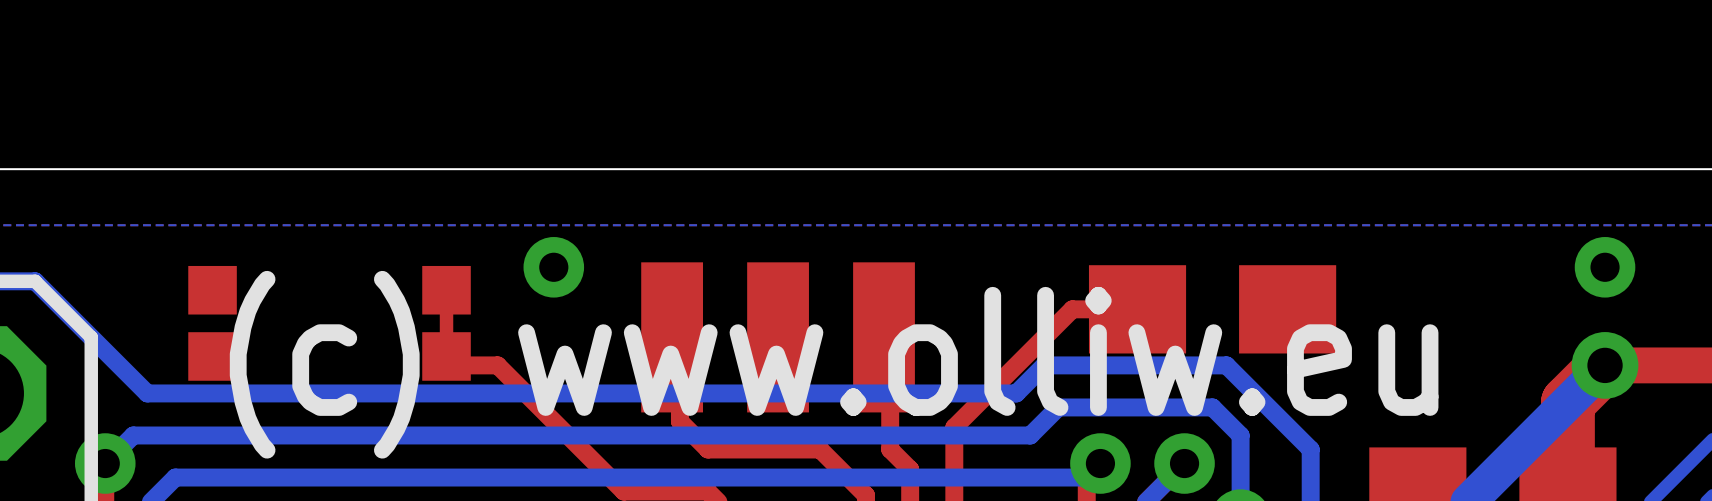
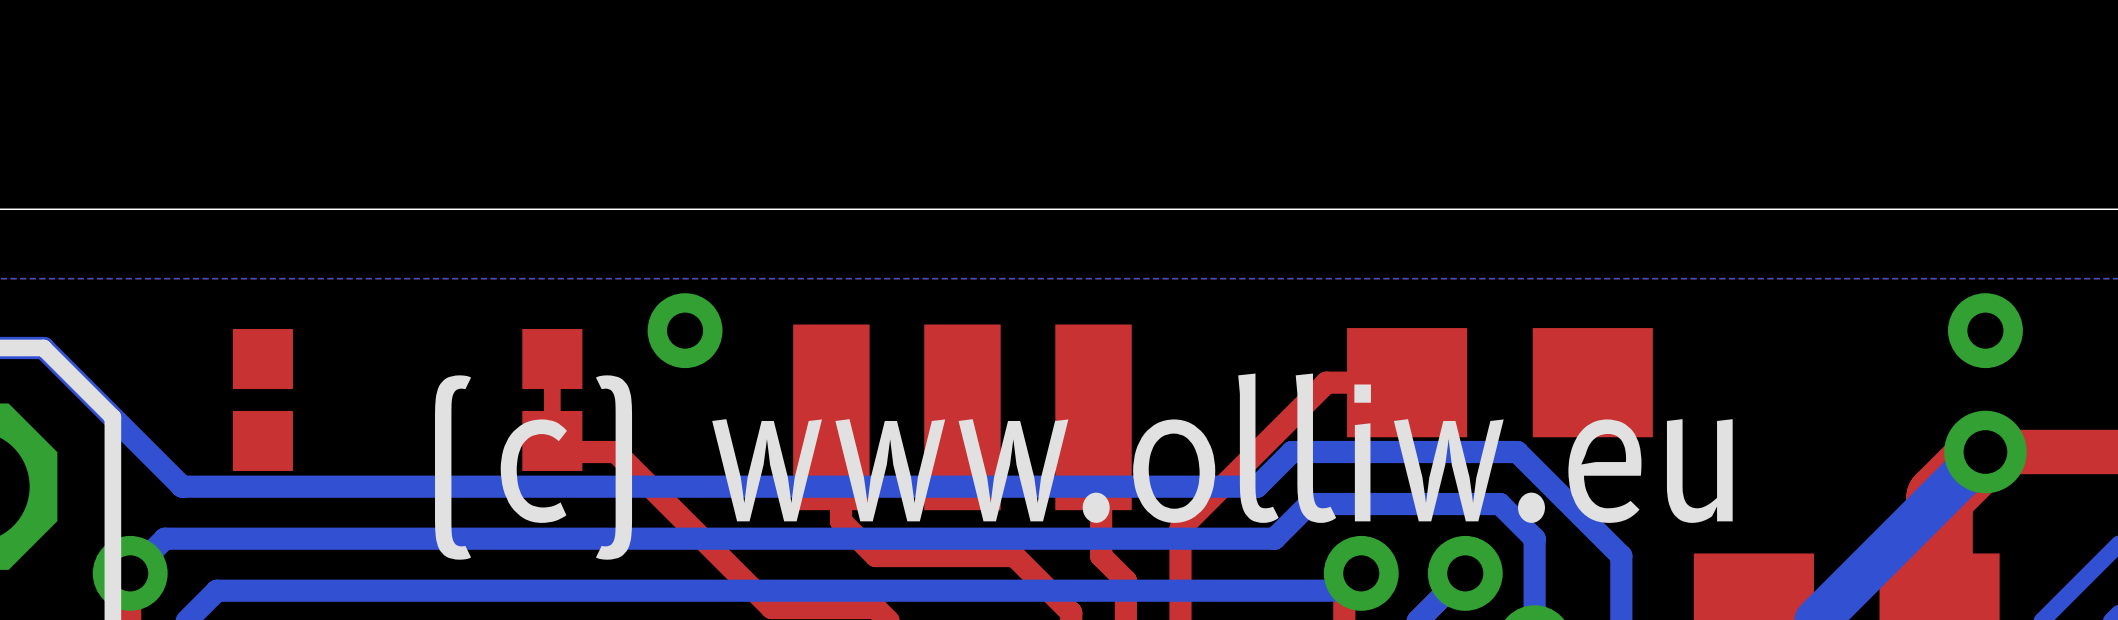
text position: (c) www.olliw.eu (834, 364) -> (c) www.olliw.eu (1083, 466)

